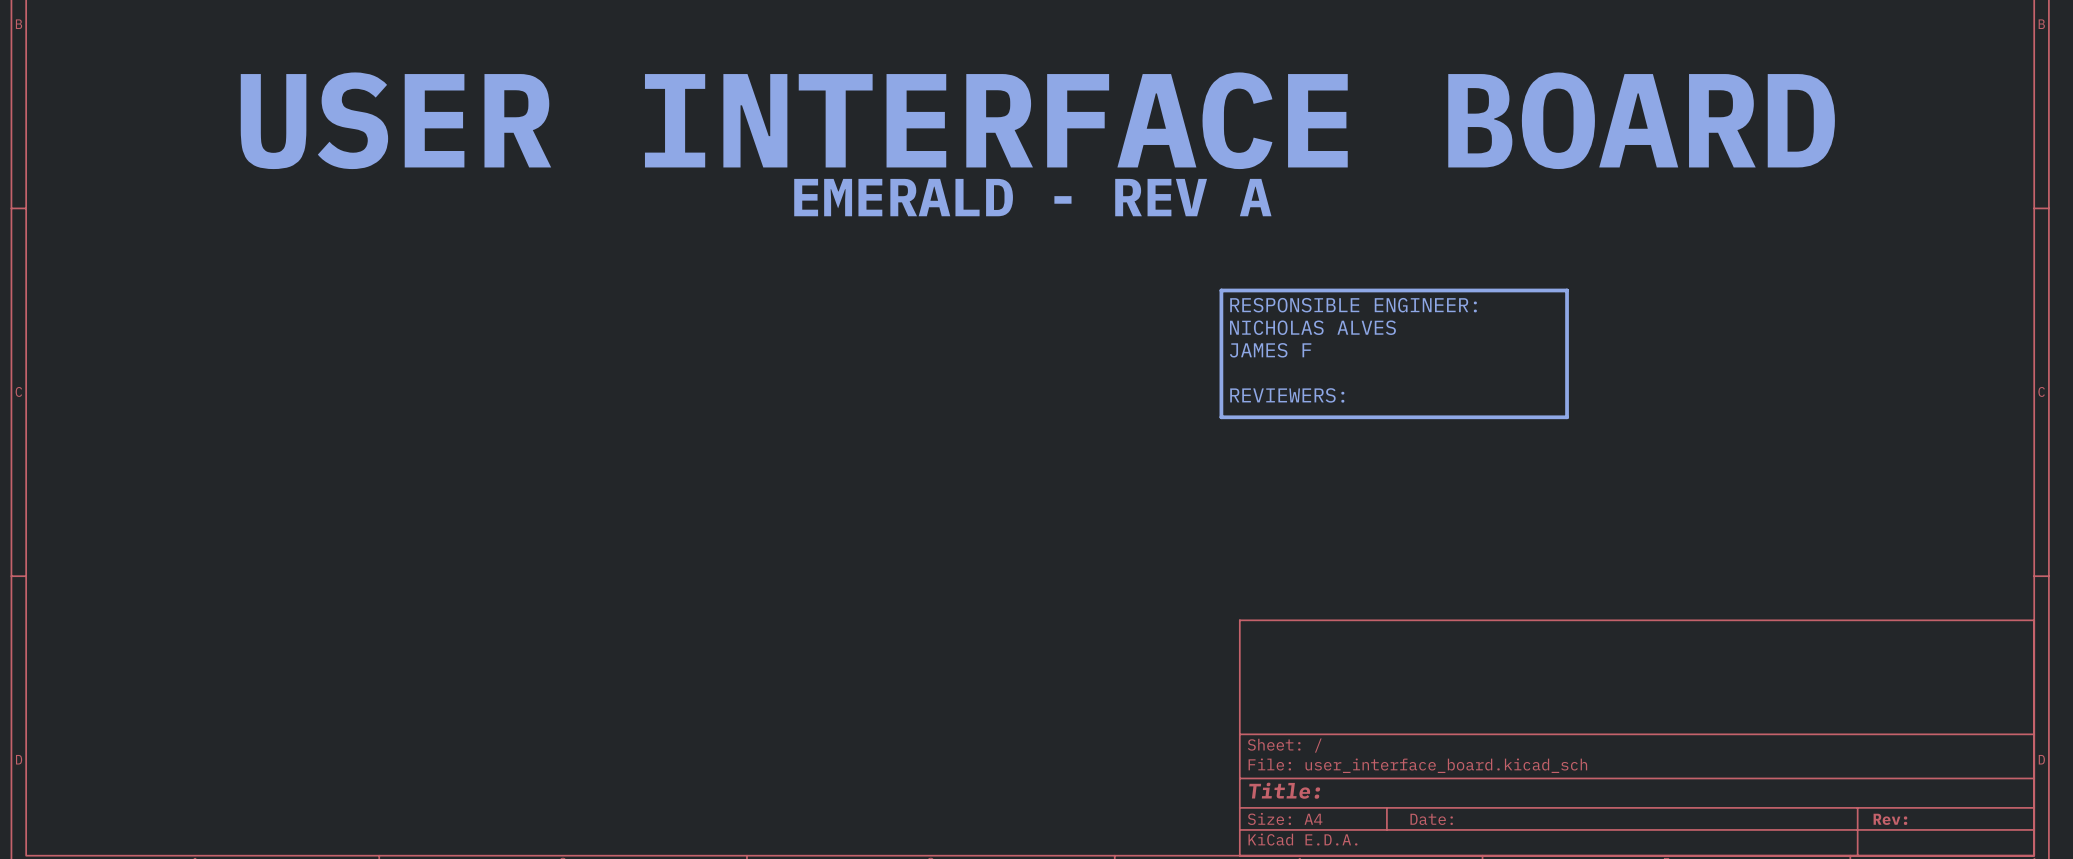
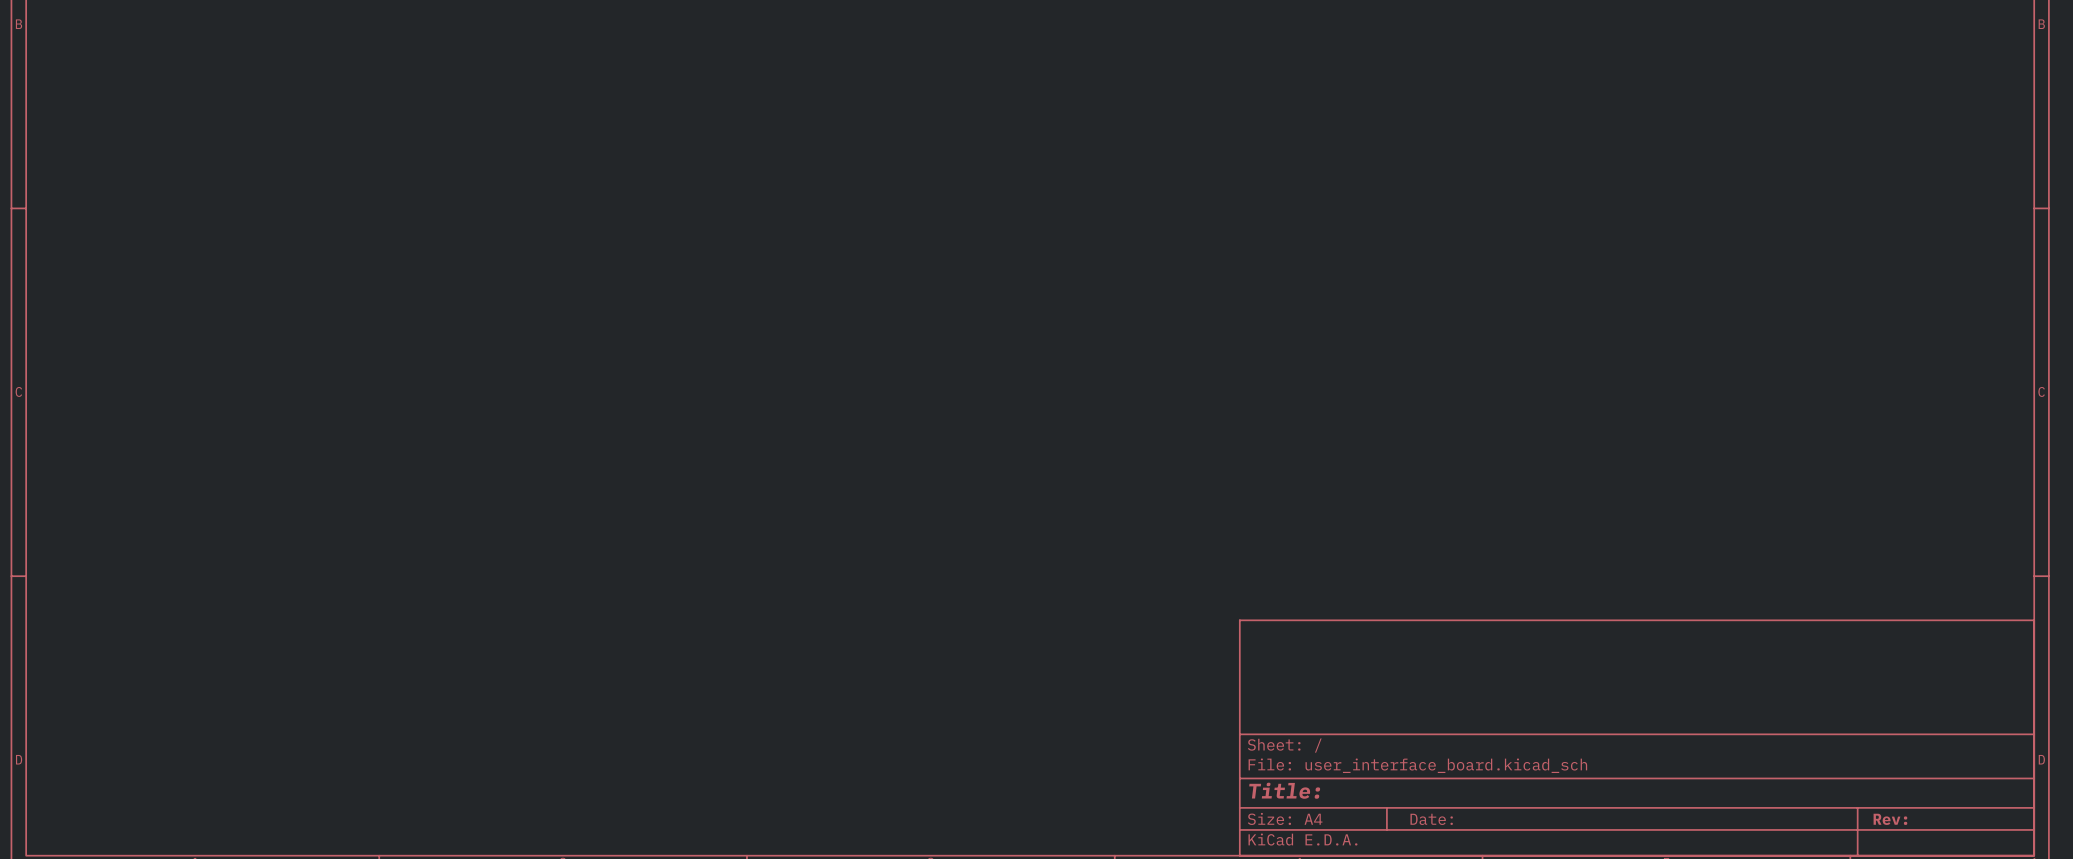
text: USER INTERFACE BOARD (1037, 120) -> none
text: EMERALD - REV A (1032, 197) -> none
line: (1221, 290) (1567, 290) (1567, 417) (1221, 417) (1221, 290) -> none
text: RESPONSIBLE ENGINEER: (1353, 305) -> none
text: NICHOLAS ALVES (1312, 327) -> none
text: JAMES F (1270, 350) -> none
text: REVIEWERS: (1287, 395) -> none

